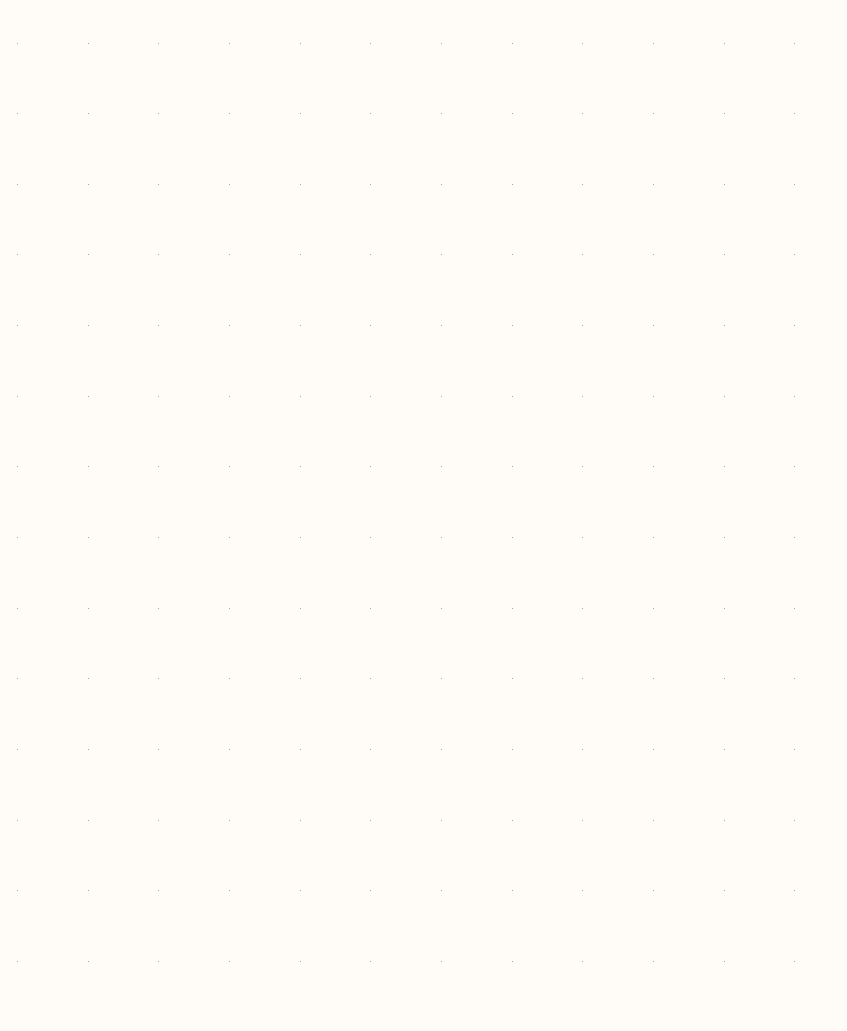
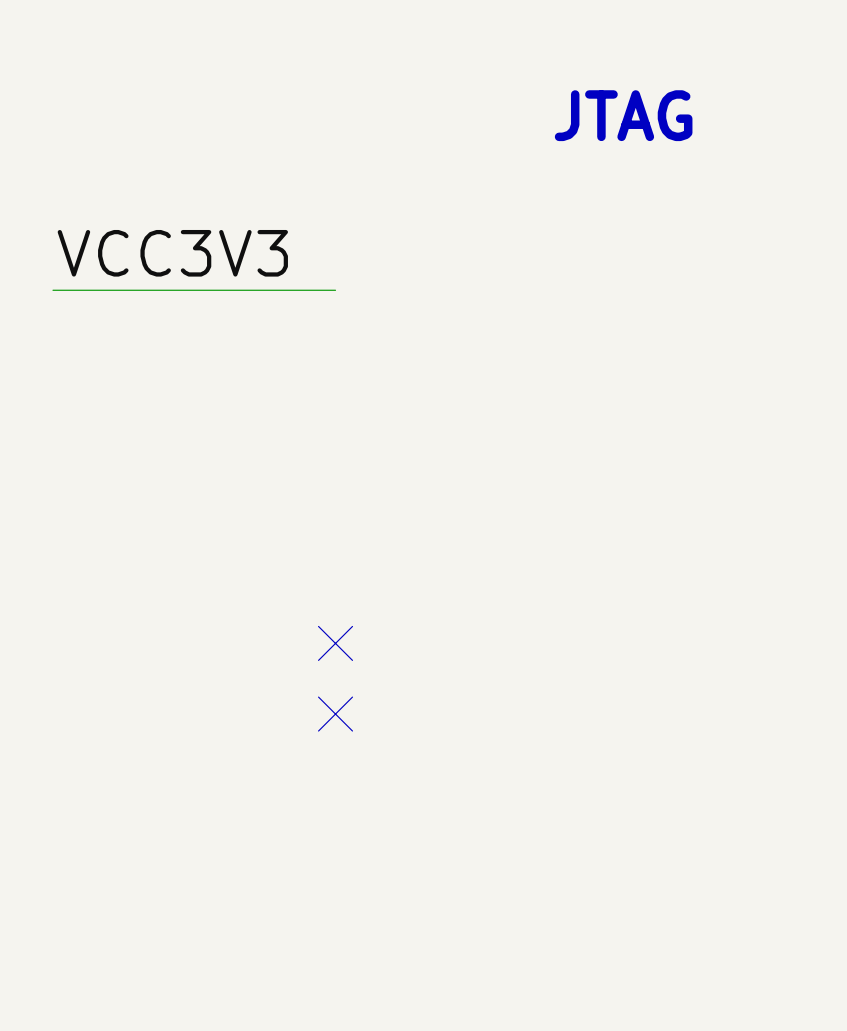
text: none -> JTAG (623, 115)
label: none -> VCC3V3 (172, 253)
wire: none -> (52, 290) (335, 290)
no-connect mark: none -> (335, 643)
no-connect mark: none -> (335, 714)

